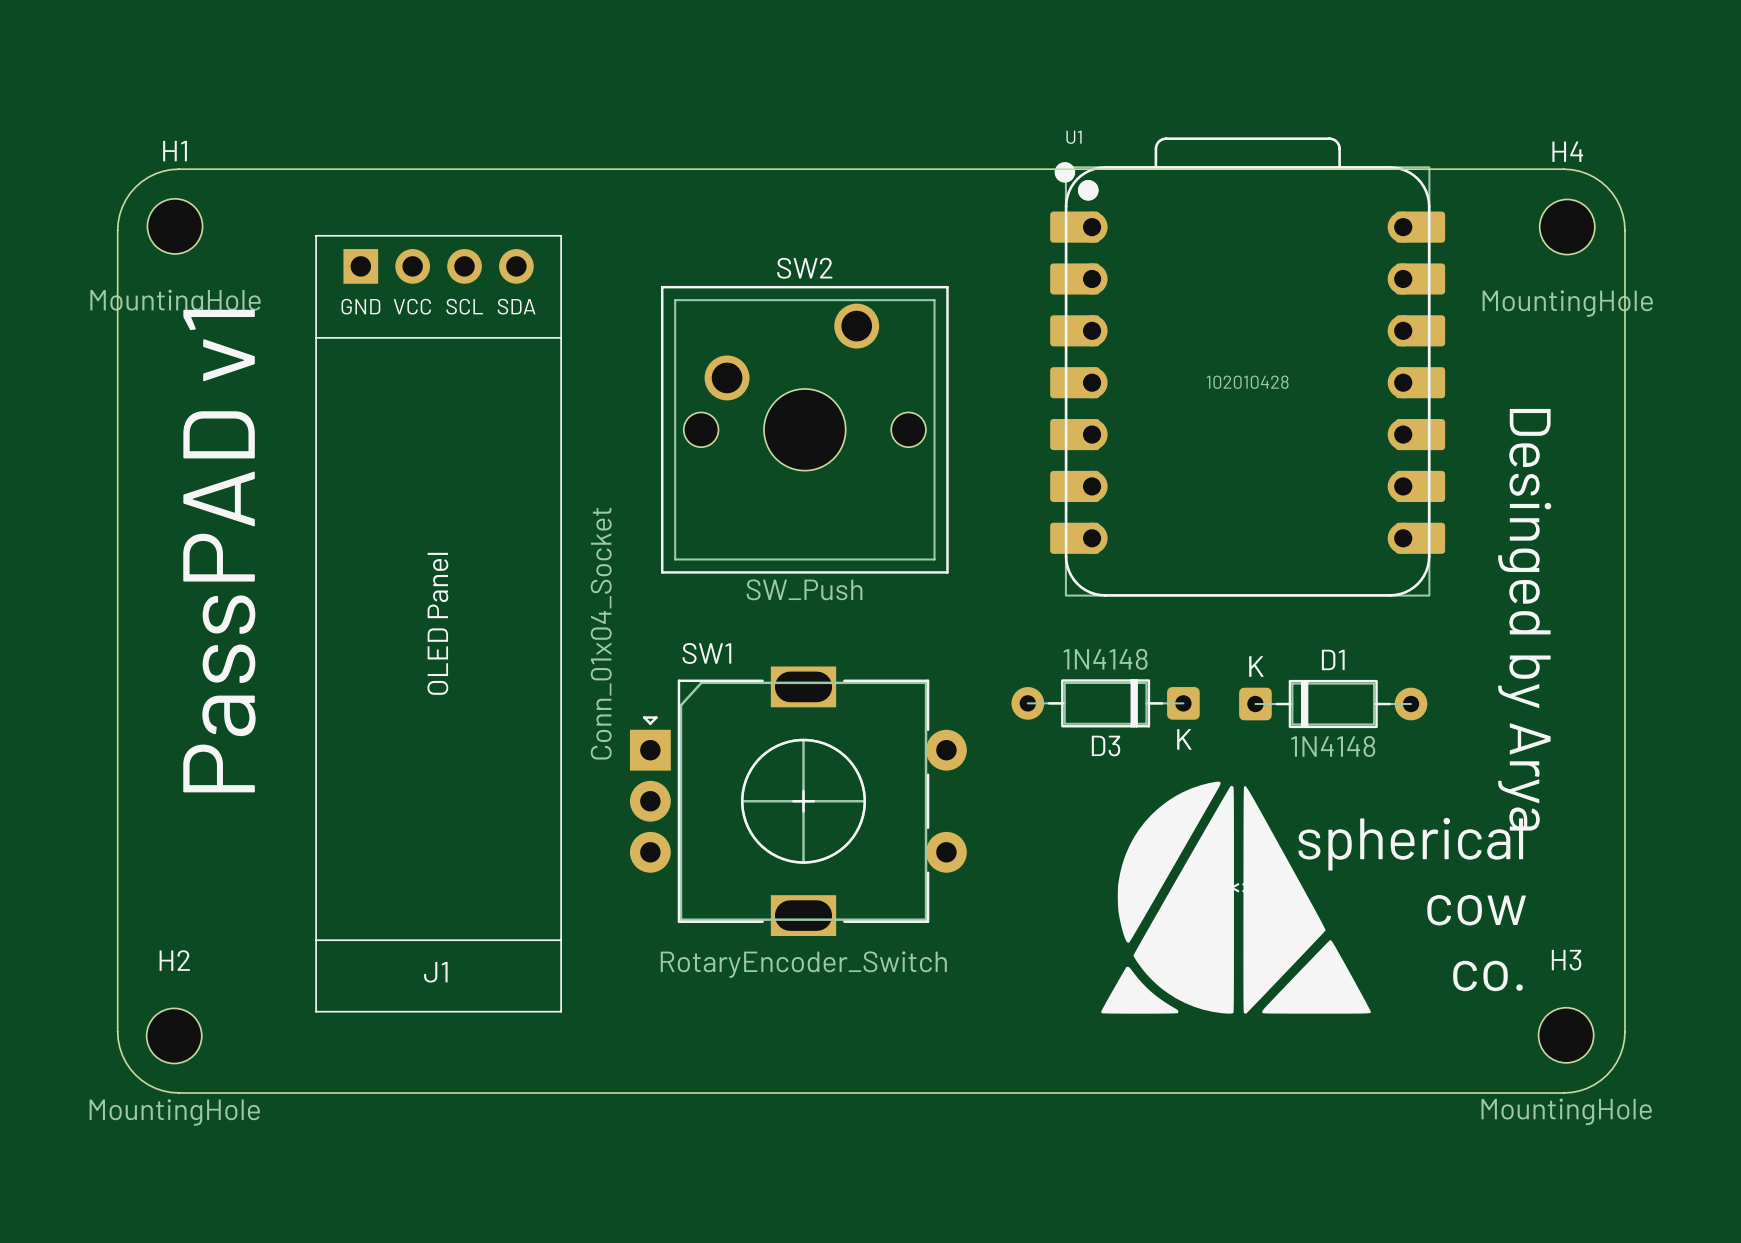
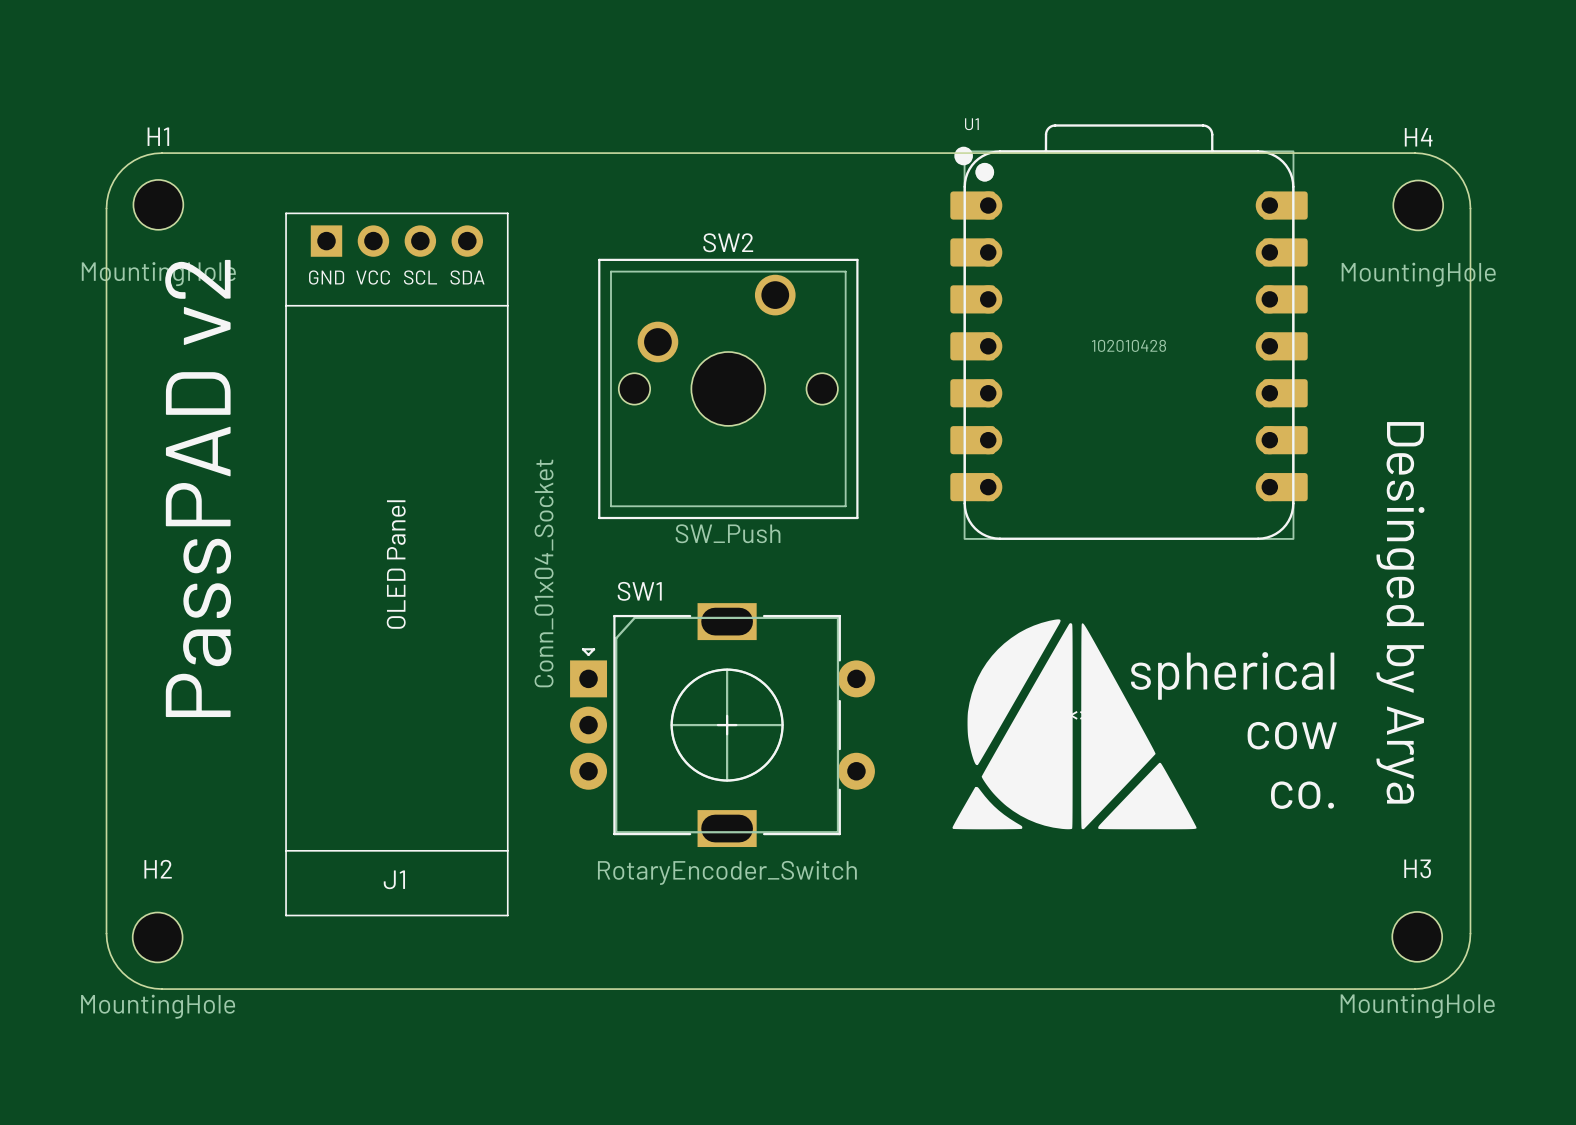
text: PassPAD v1 (219, 551) -> PassPAD v2 (198, 488)
text position: Desinged by Arya (1524, 619) -> Desinged by Arya (1400, 612)
D3: 1N4148 (1105, 703) -> none
D1: 1N4148 (1333, 704) -> none
text position: spherical (1410, 844) -> spherical (1232, 675)
part position: (1236, 897) -> (1074, 724)
text position: cow (1476, 910) -> cow (1292, 735)
text position: co. (1487, 975) -> co. (1302, 795)

